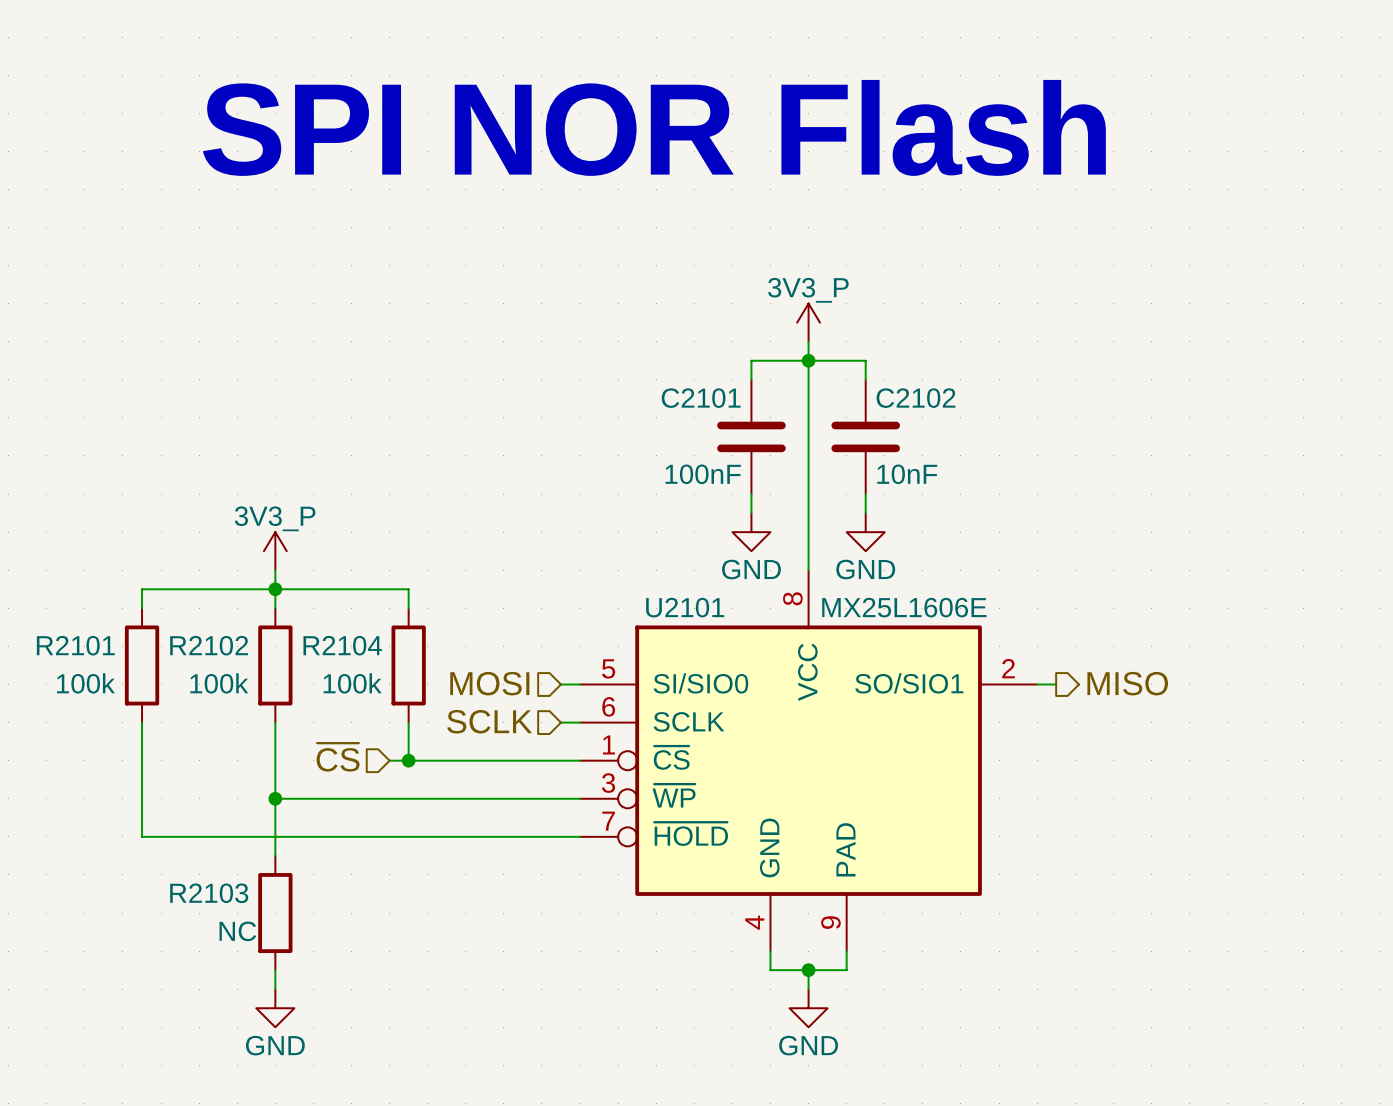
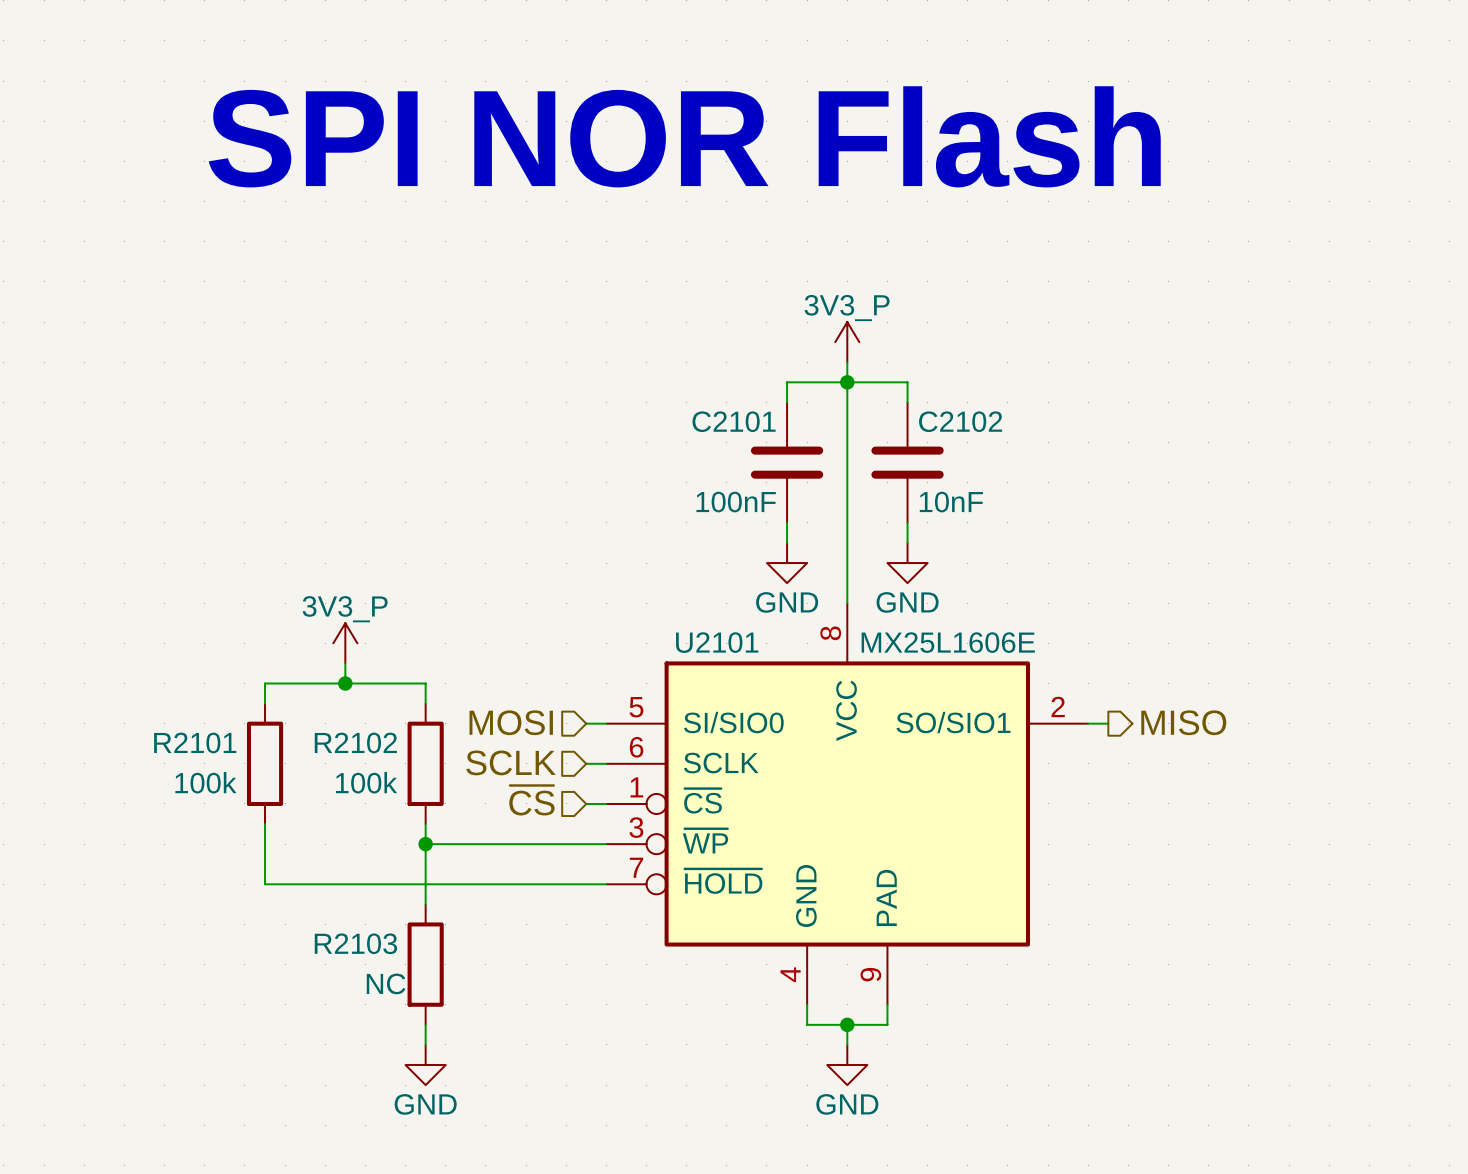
power symbol position: 3V3_P (275, 551) -> 3V3_P (345, 643)
wire: (275, 570) (275, 608) -> none
junction: (275, 589) -> none
wire: (142, 608) (142, 589) (408, 589) (408, 608) -> none
wire: none -> (345, 663) (345, 683)
junction: none -> (345, 683)
R2101 position: (142, 665) -> (265, 763)
wire: none -> (265, 703) (265, 683) (425, 683) (425, 703)
R2102 position: (275, 665) -> (425, 763)
R2104: 100k (408, 665) -> none
wire: (142, 722) (142, 836) (256, 836) -> (265, 824) (265, 884)
wire: (275, 722) (275, 855) -> none
wire: (408, 722) (408, 760) -> none
hierarchical label position: ~{CS} (338, 757) -> ~{CS} (531, 800)
wire: (389, 760) (561, 760) -> none
junction position: (408, 760) -> (425, 844)
wire: none -> (425, 824) (425, 904)
wire: (275, 798) (408, 798) -> none
junction: (275, 798) -> none
R2103 position: (275, 913) -> (425, 964)
wire: (275, 970) (275, 989) -> (425, 1024) (425, 1044)
power symbol position: GND (275, 1008) -> GND (425, 1065)

